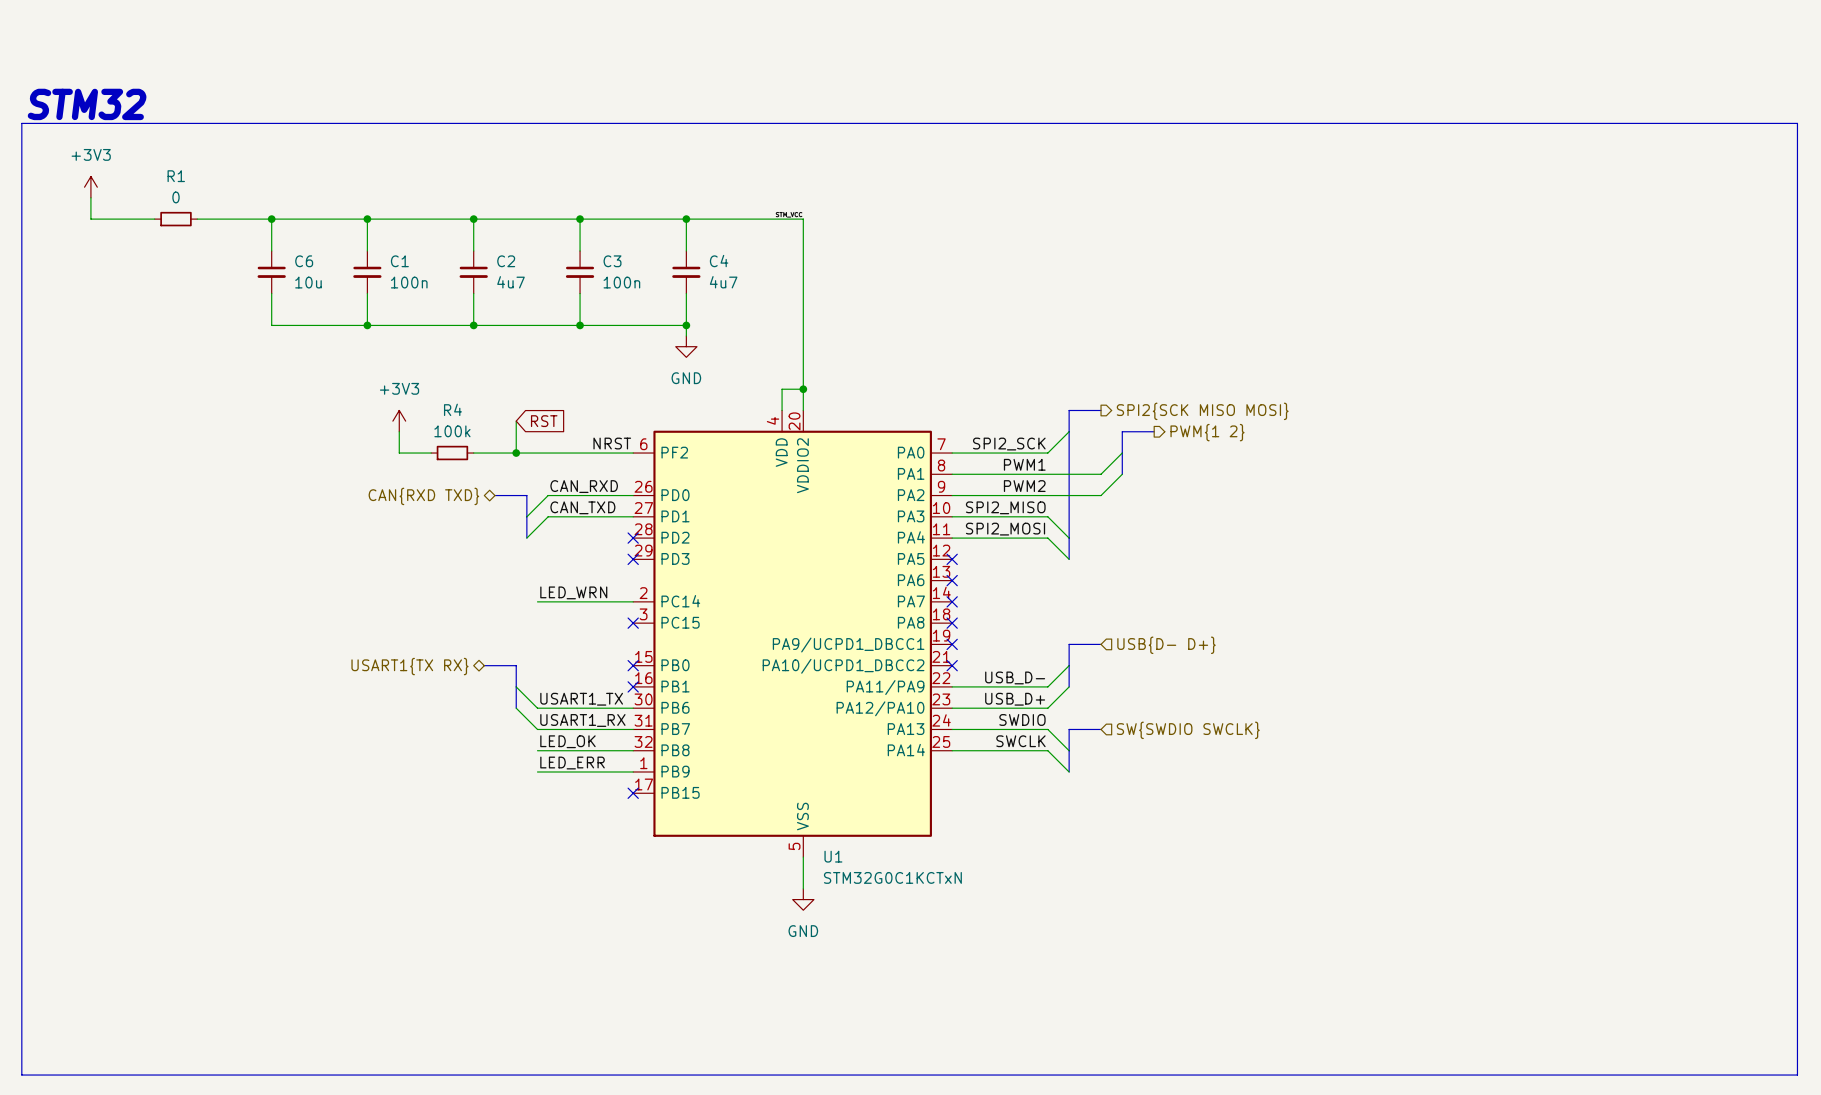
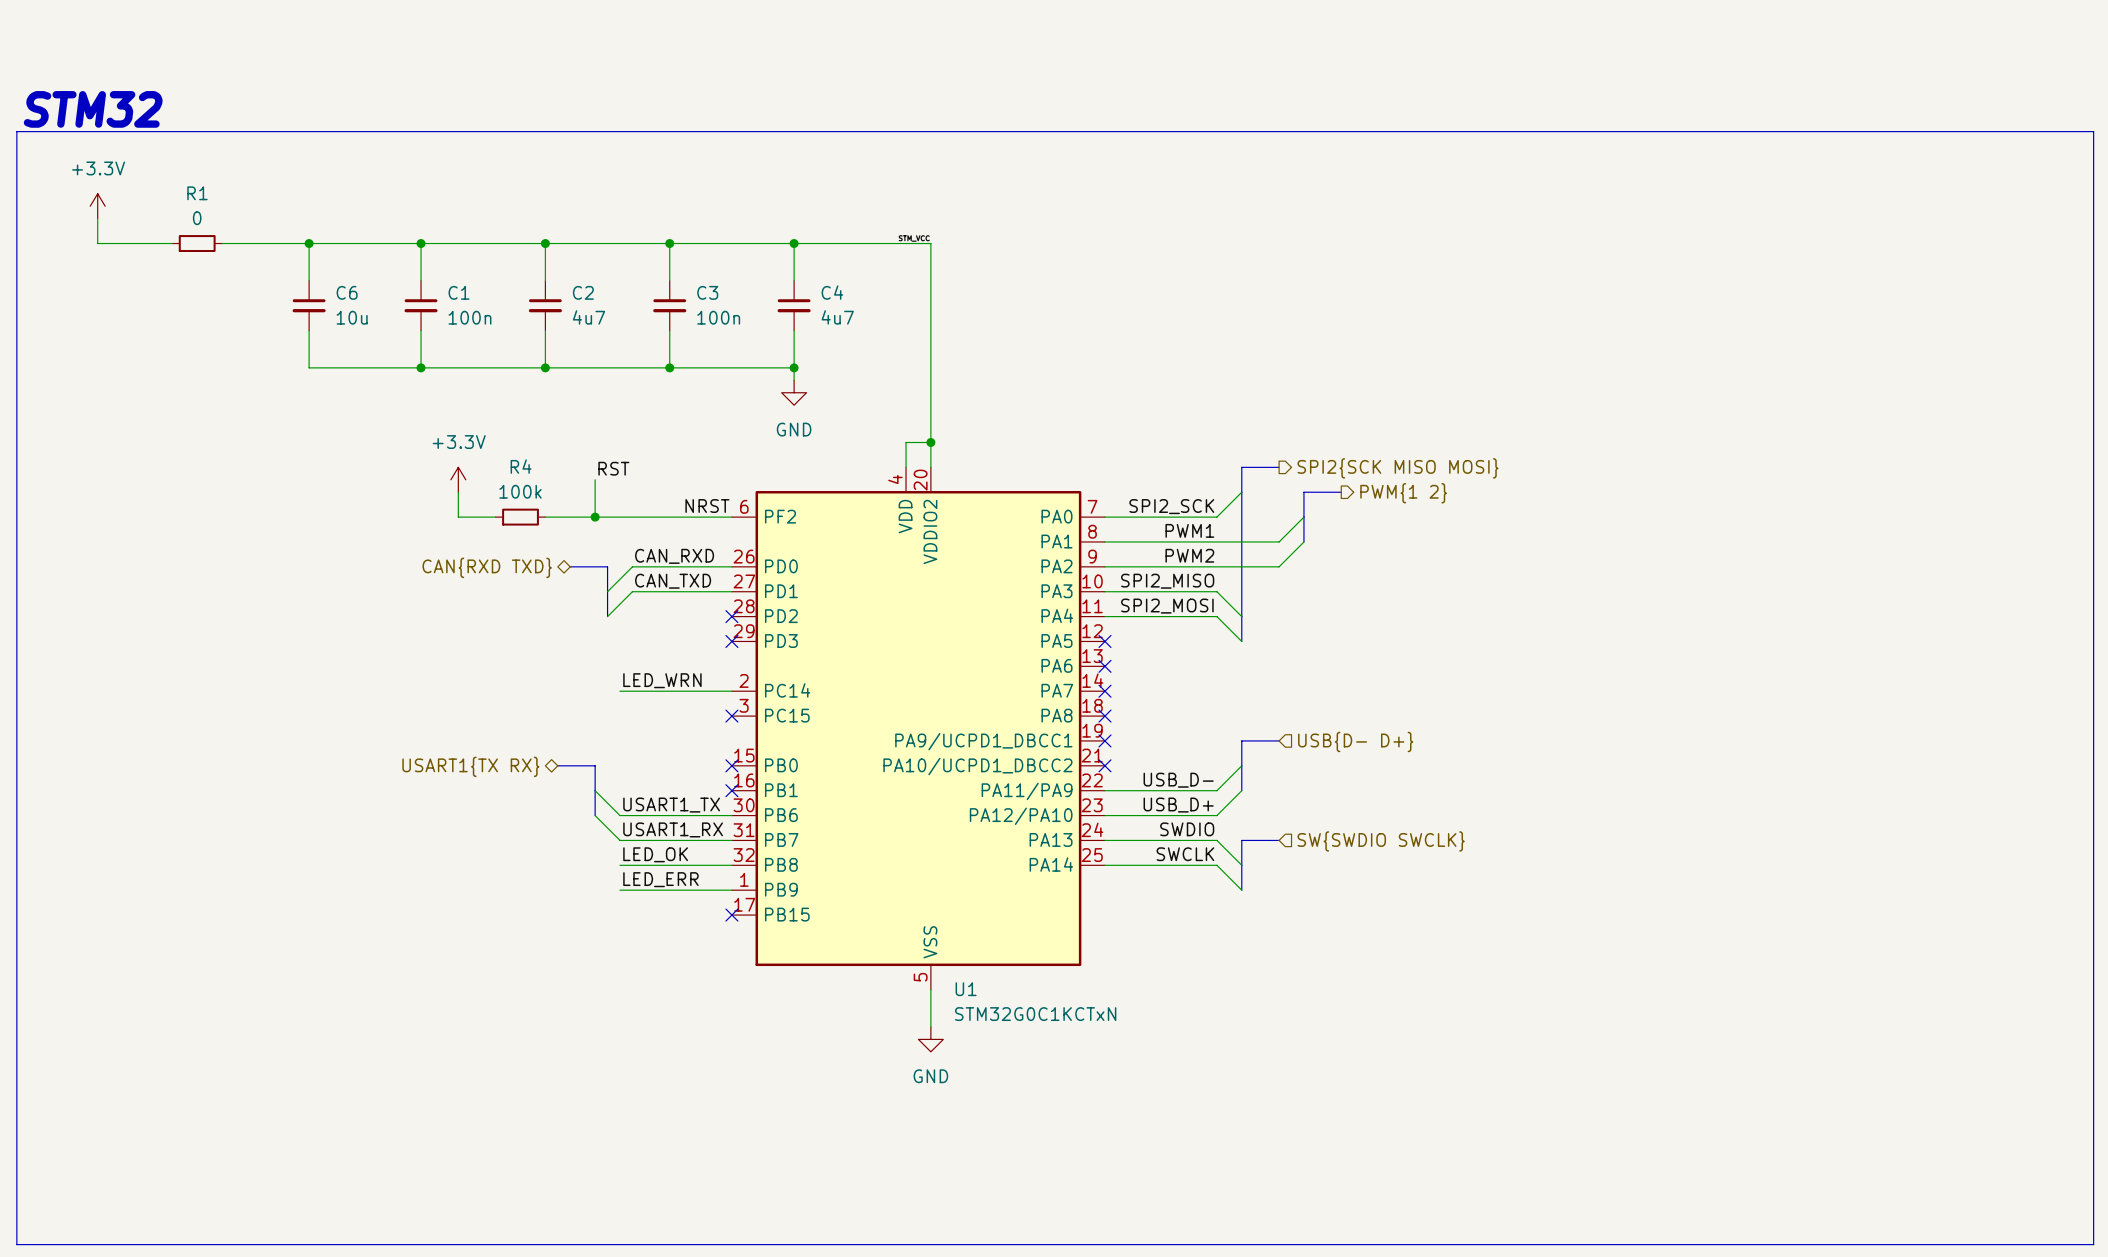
power symbol: +3V3 (90, 187) -> +3.3V (97, 206)
label: none -> RST (613, 468)
power symbol: +3V3 (399, 421) -> +3.3V (458, 479)
global label: RST (544, 421) -> none

